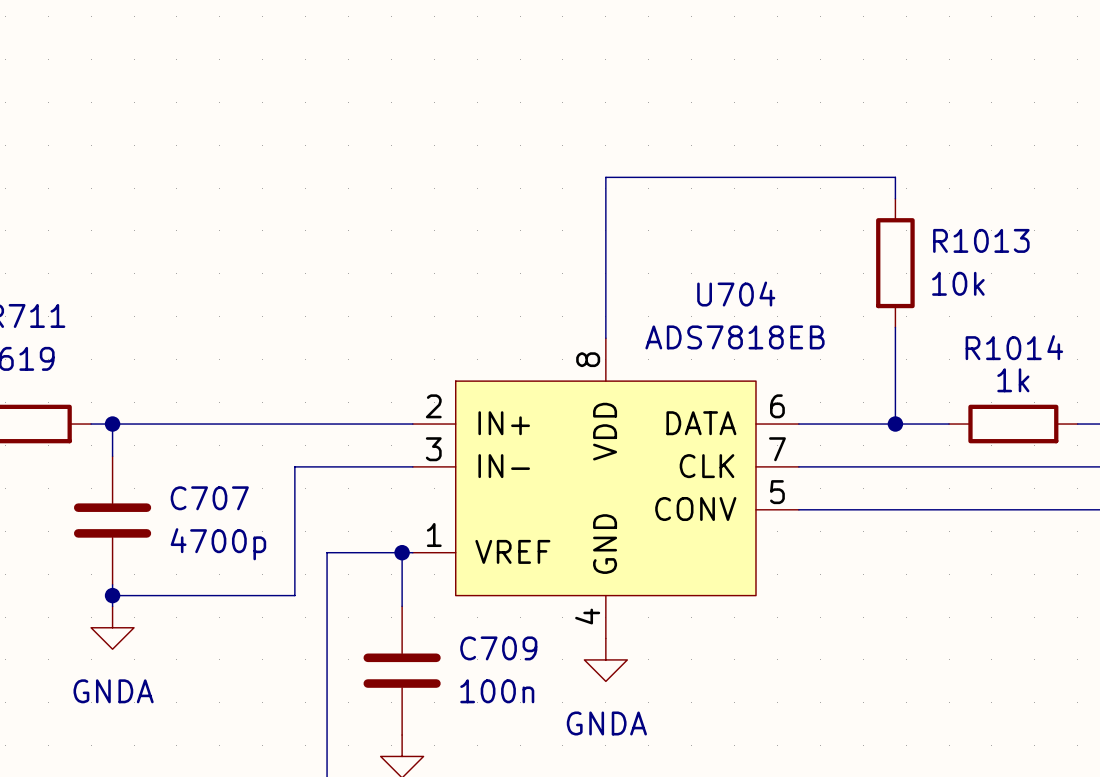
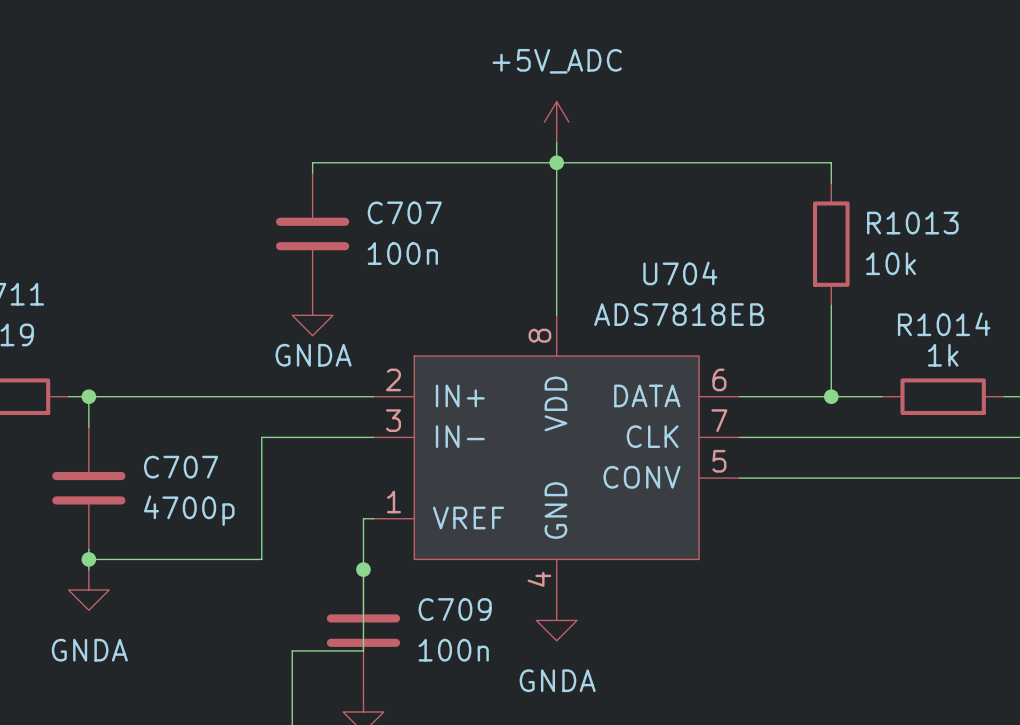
power symbol: none -> +5V_ADC (556, 122)
wire: none -> (556, 142) (556, 162) (312, 162) (312, 172)
junction: none -> (556, 162)
C707: none -> 100n (312, 233)
power symbol: none -> GNDA (312, 315)
wire: (402, 552) (327, 552) (327, 692) -> (363, 569) (363, 650) (292, 650)
junction position: (402, 552) -> (363, 569)

